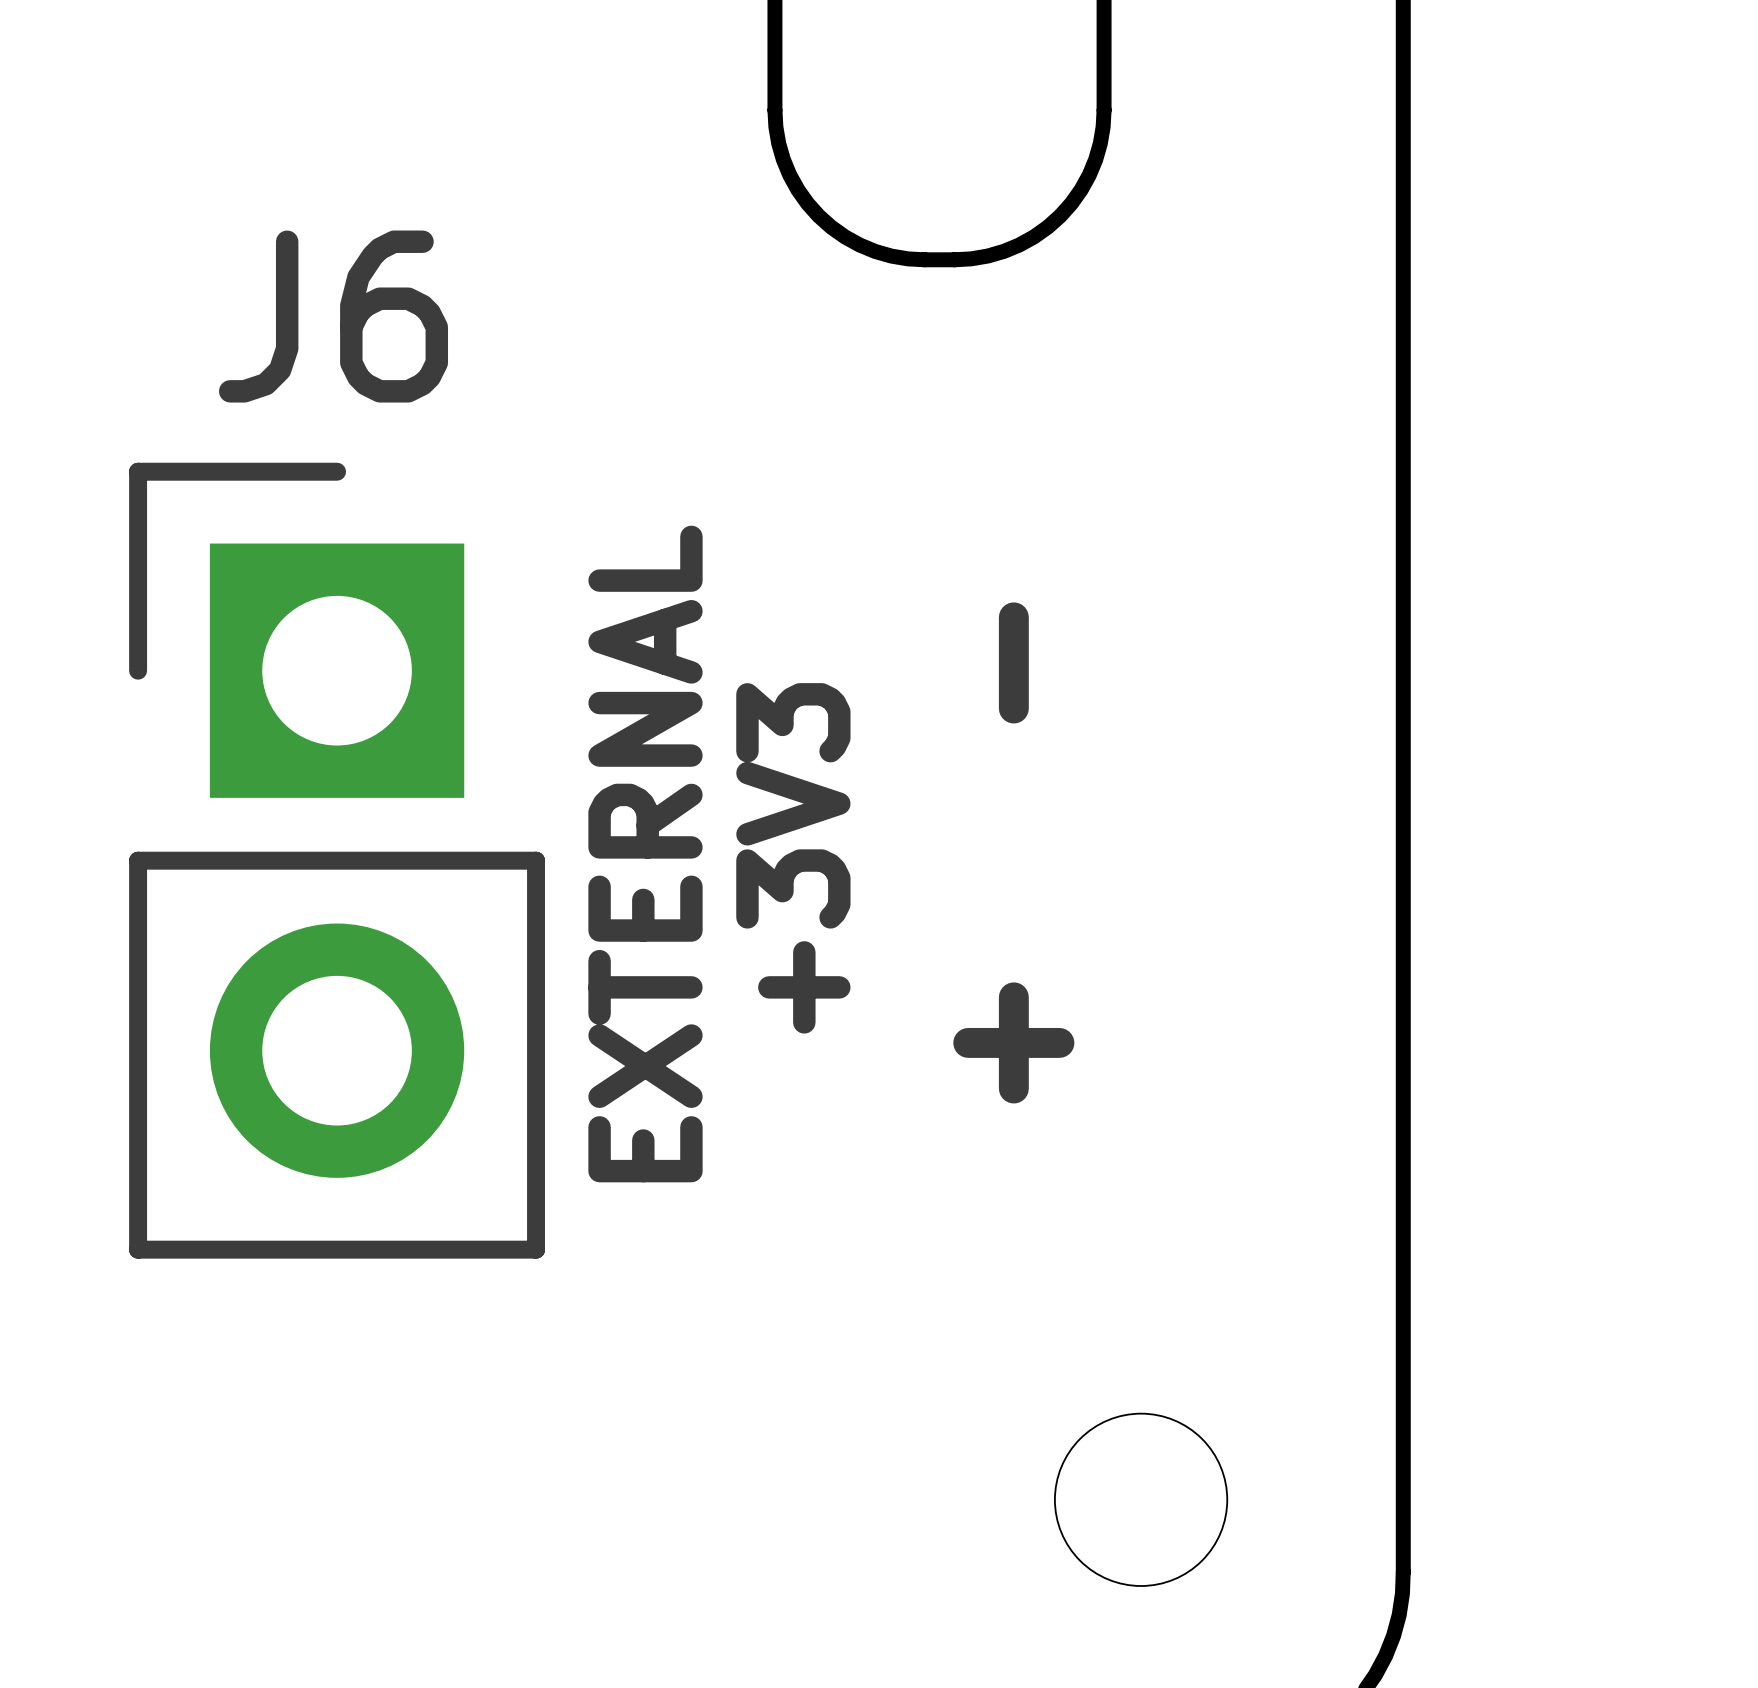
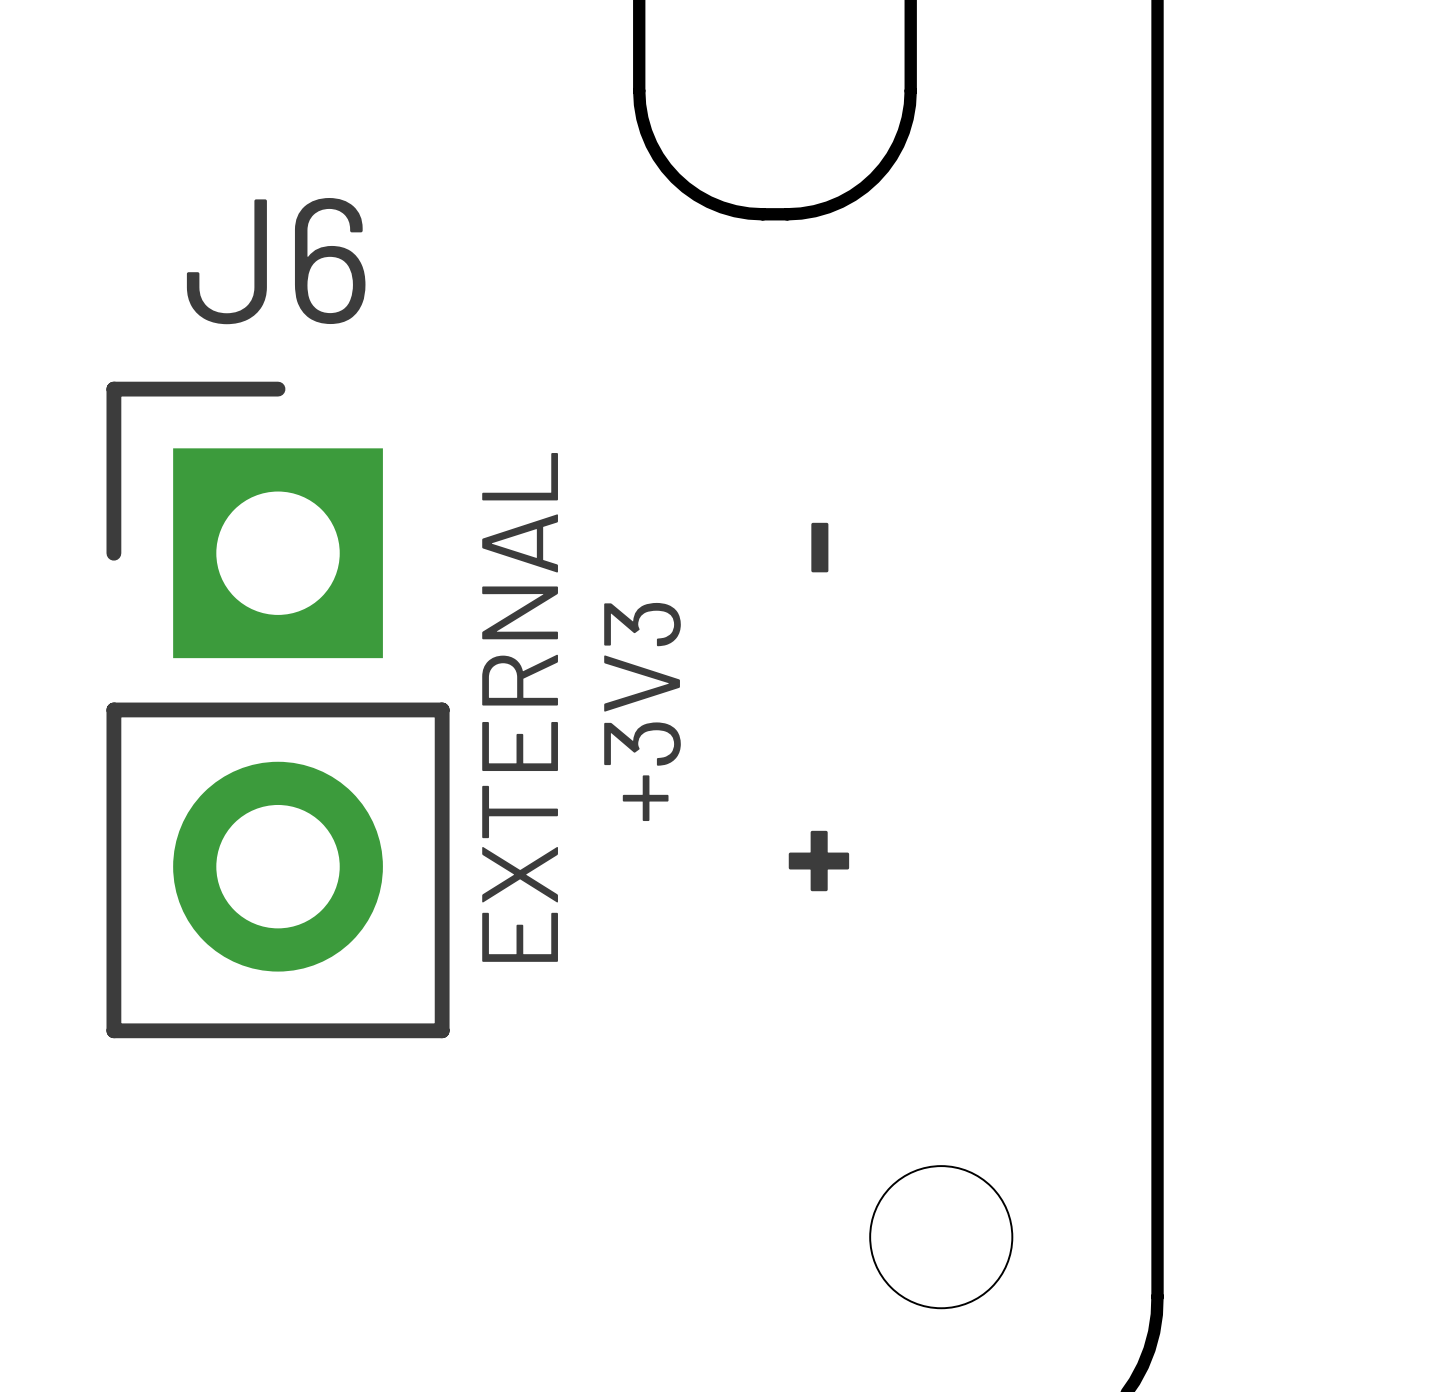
text position: - (1013, 662) -> - (819, 547)
text position: EXTERNAL (645, 853) -> EXTERNAL (520, 707)
text position: +3V3 (793, 858) -> +3V3 (642, 711)
text position: + (1013, 1042) -> + (818, 861)

